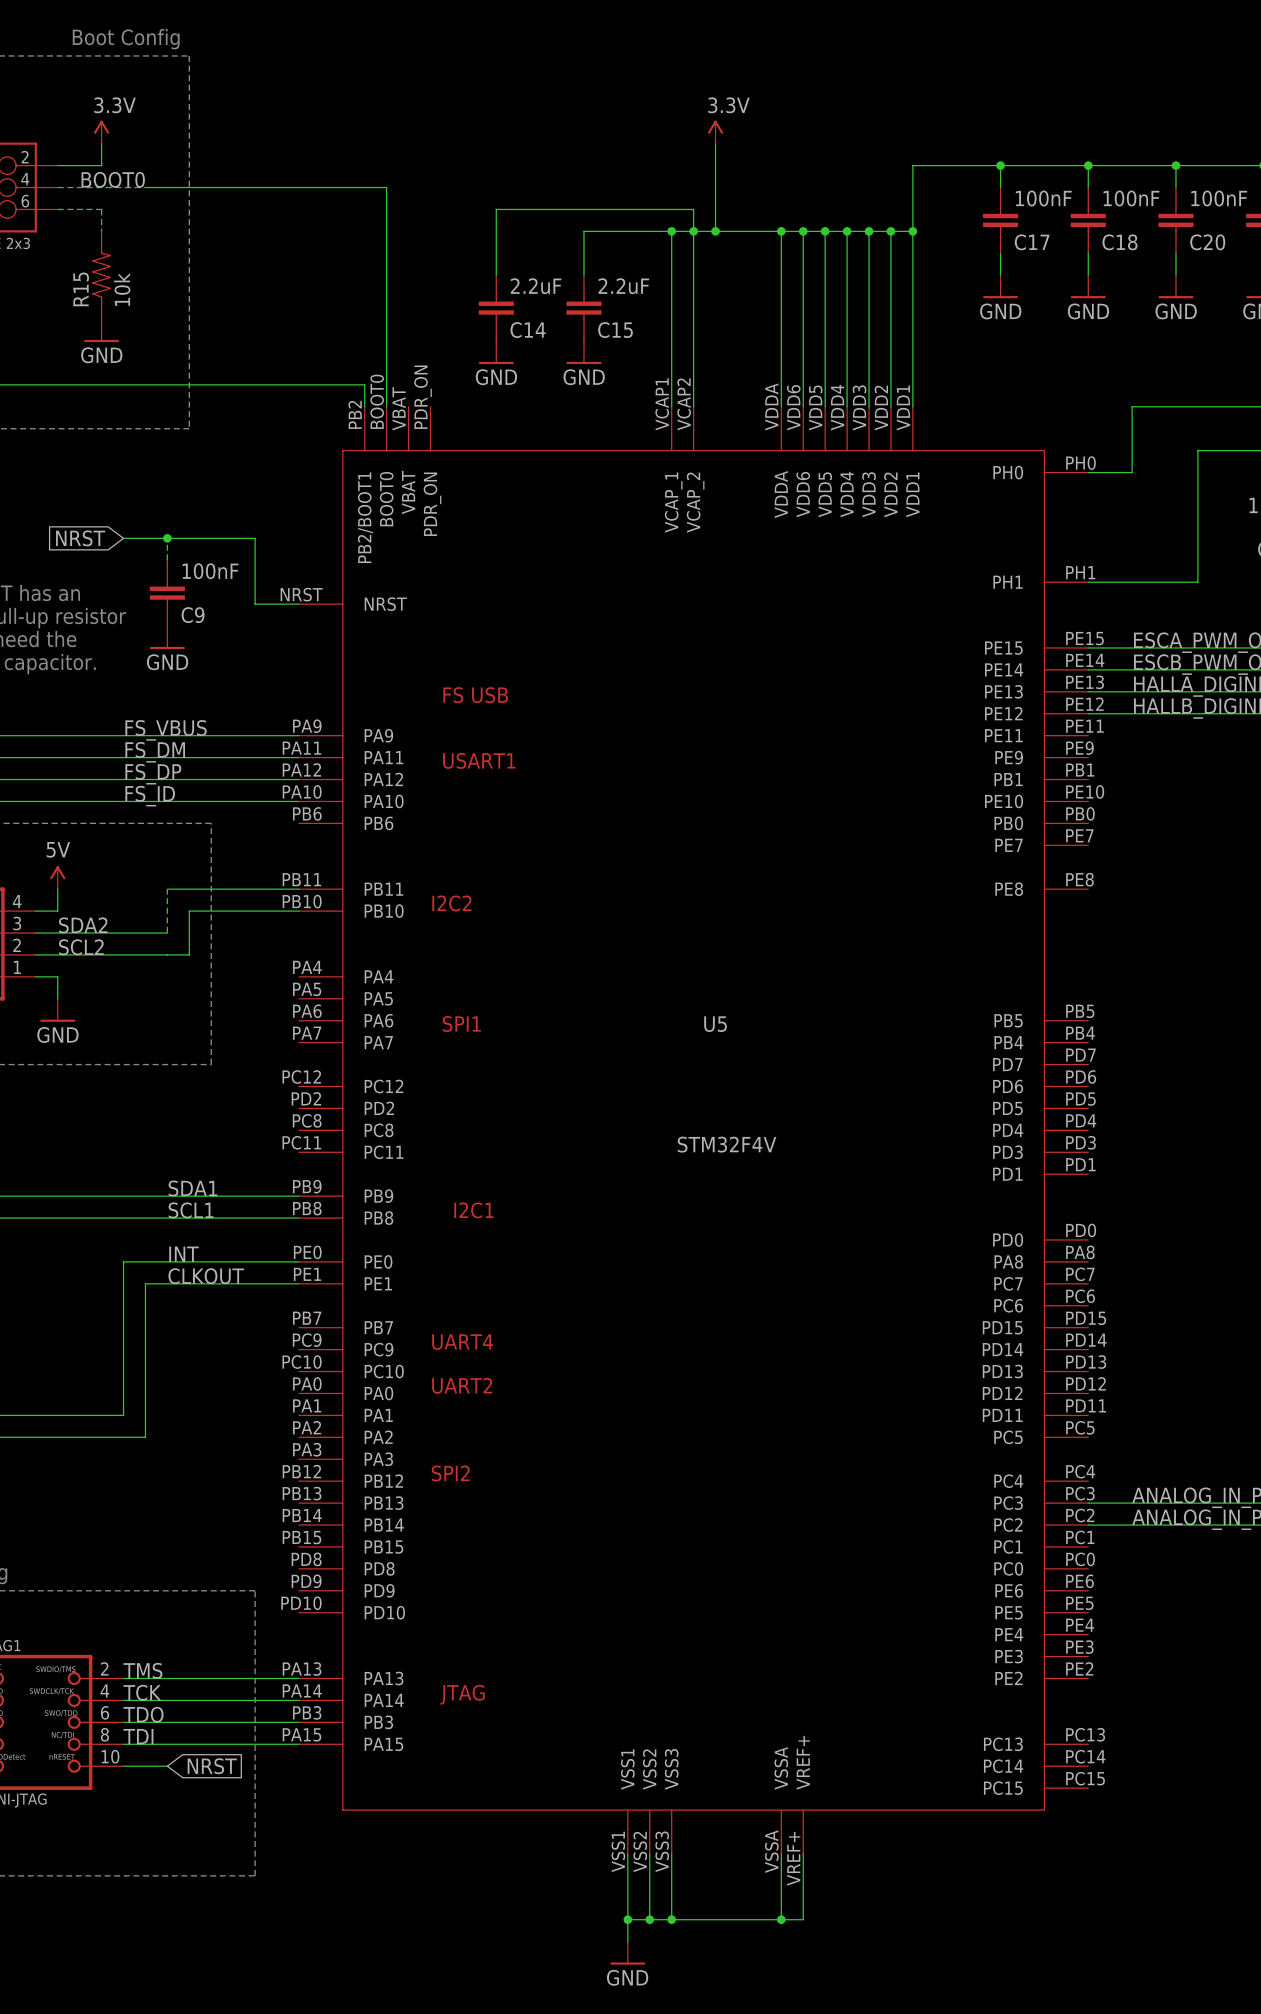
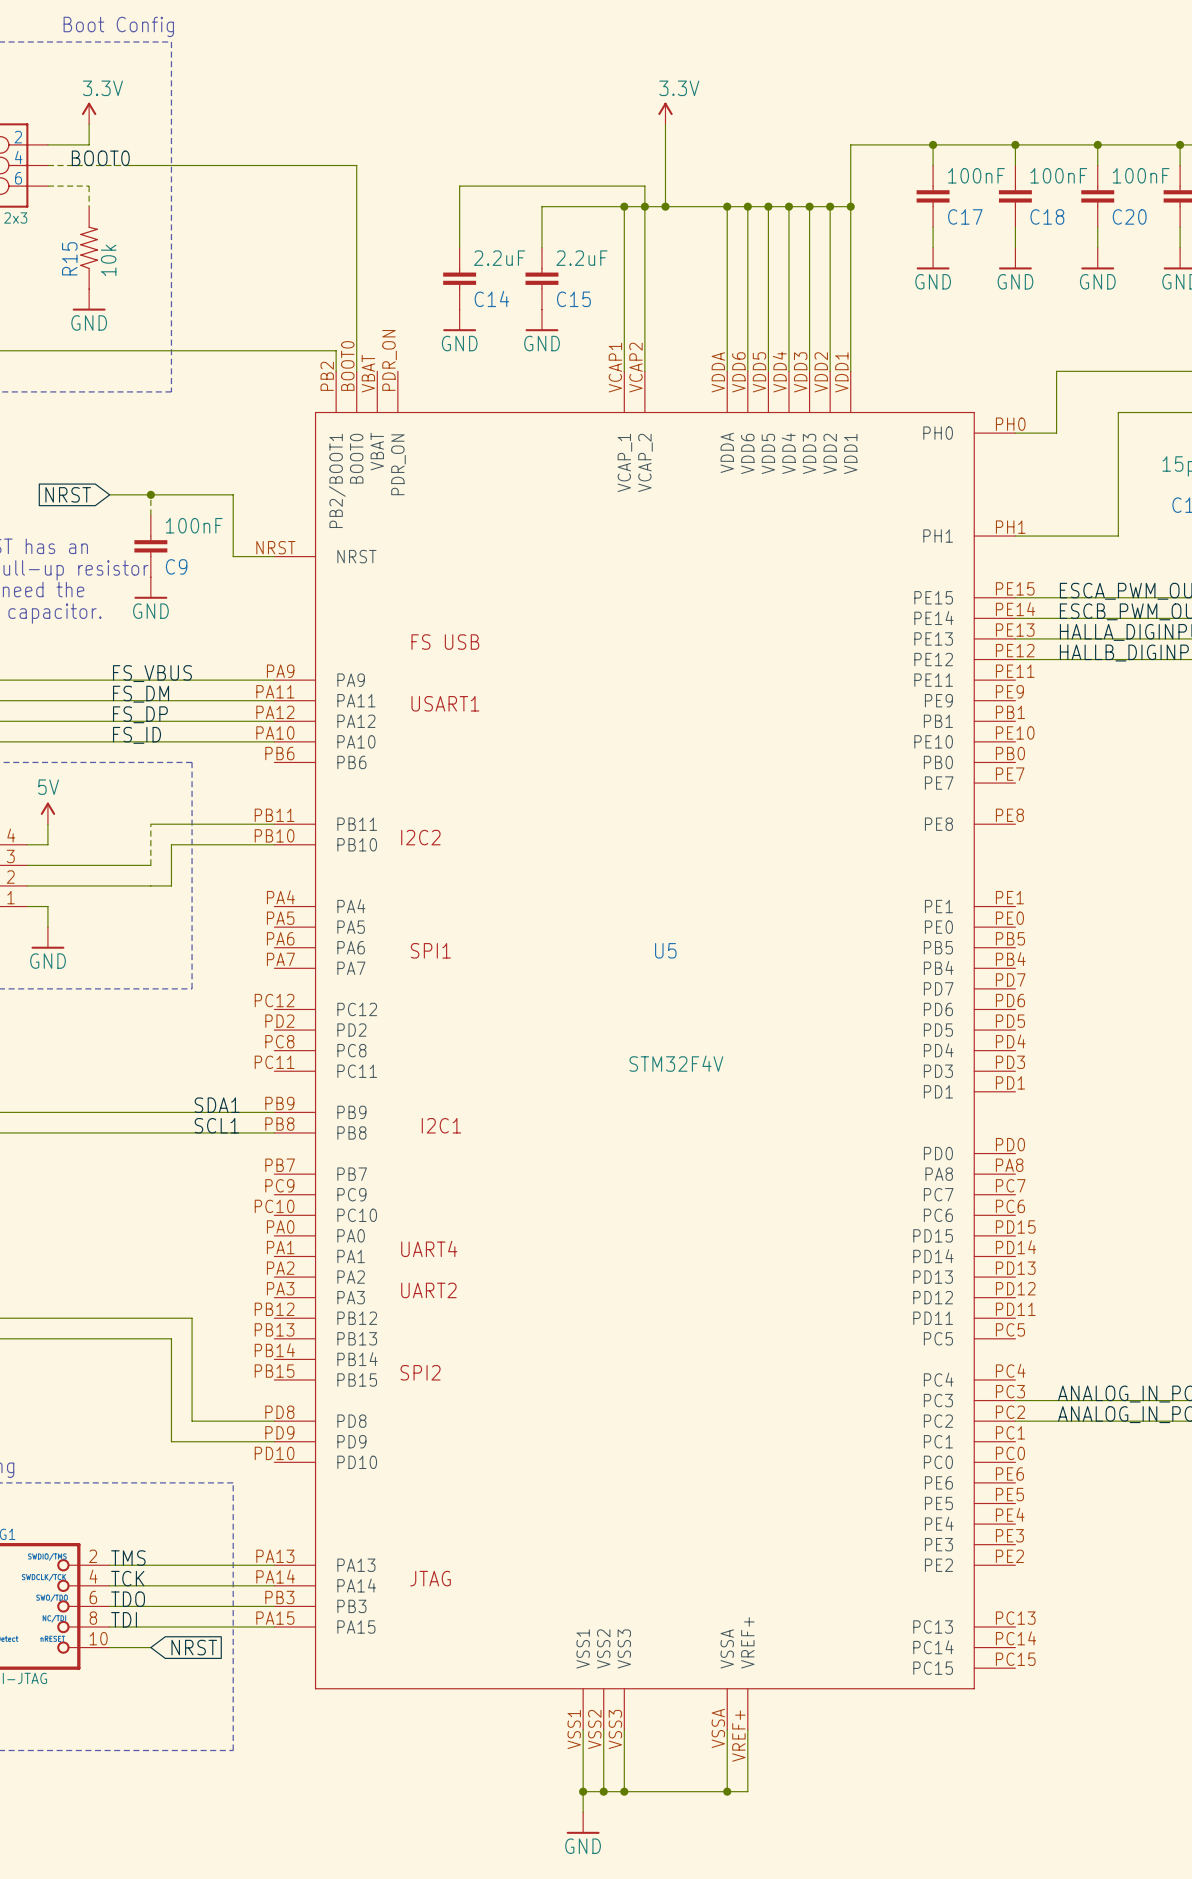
U5 symbol: [298, 406, 1089, 1854] -> [274, 371, 1016, 1730]
label: SDA2 (83, 925) -> none
label: SCL2 (81, 947) -> none
label position: SDA1 (192, 1188) -> SDA1 (217, 1105)
label position: SCL1 (191, 1210) -> SCL1 (216, 1125)
label: INT (184, 1254) -> none
wire: (298, 1261) (123, 1261) (123, 1415) -> (274, 1421) (192, 1421) (192, 1318) (109, 1318)
label: CLKOUT (206, 1276) -> none
wire: (298, 1283) (145, 1283) (145, 1437) -> (274, 1441) (171, 1441) (171, 1338) (130, 1338)

